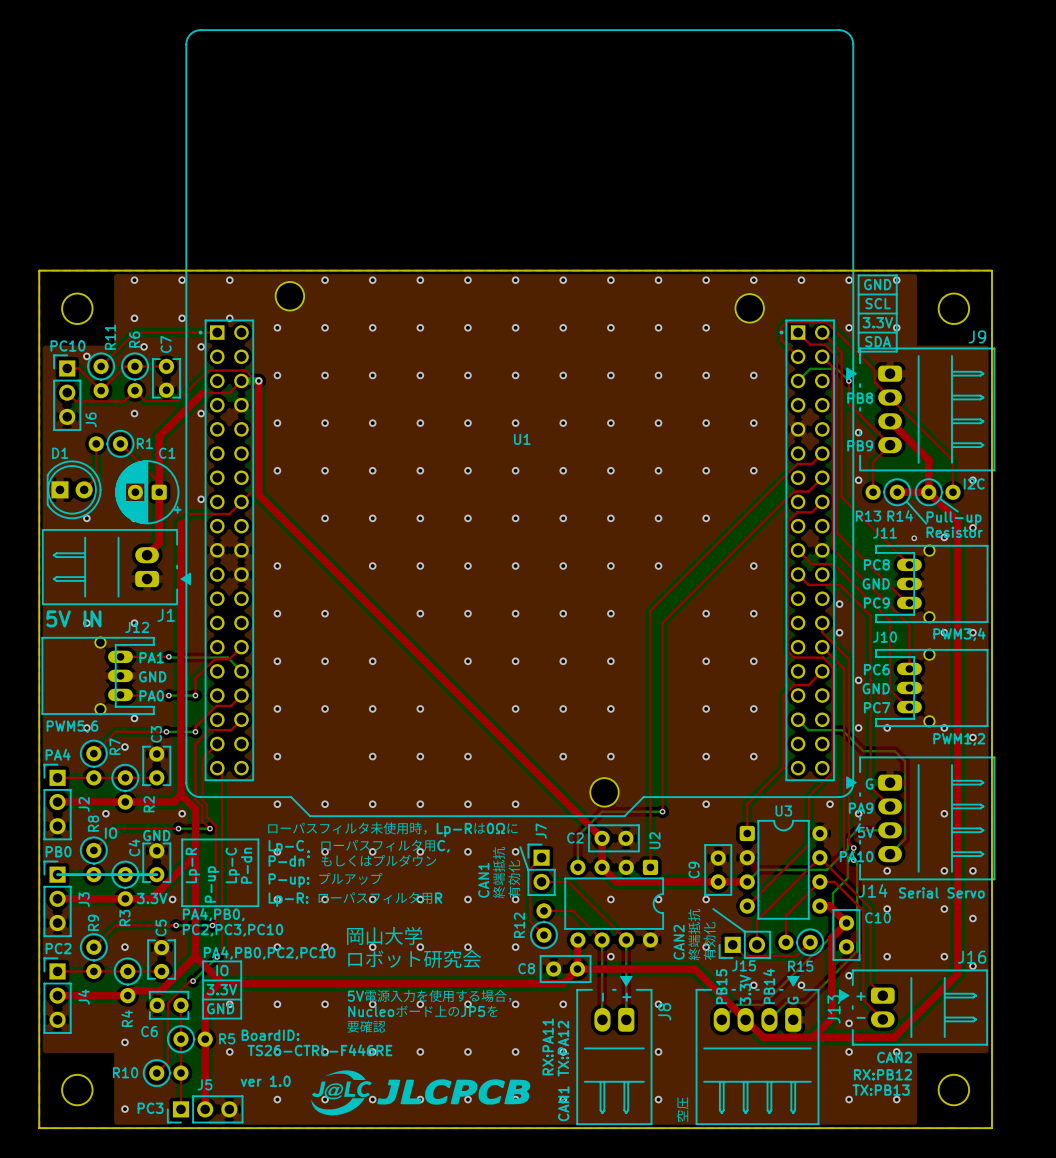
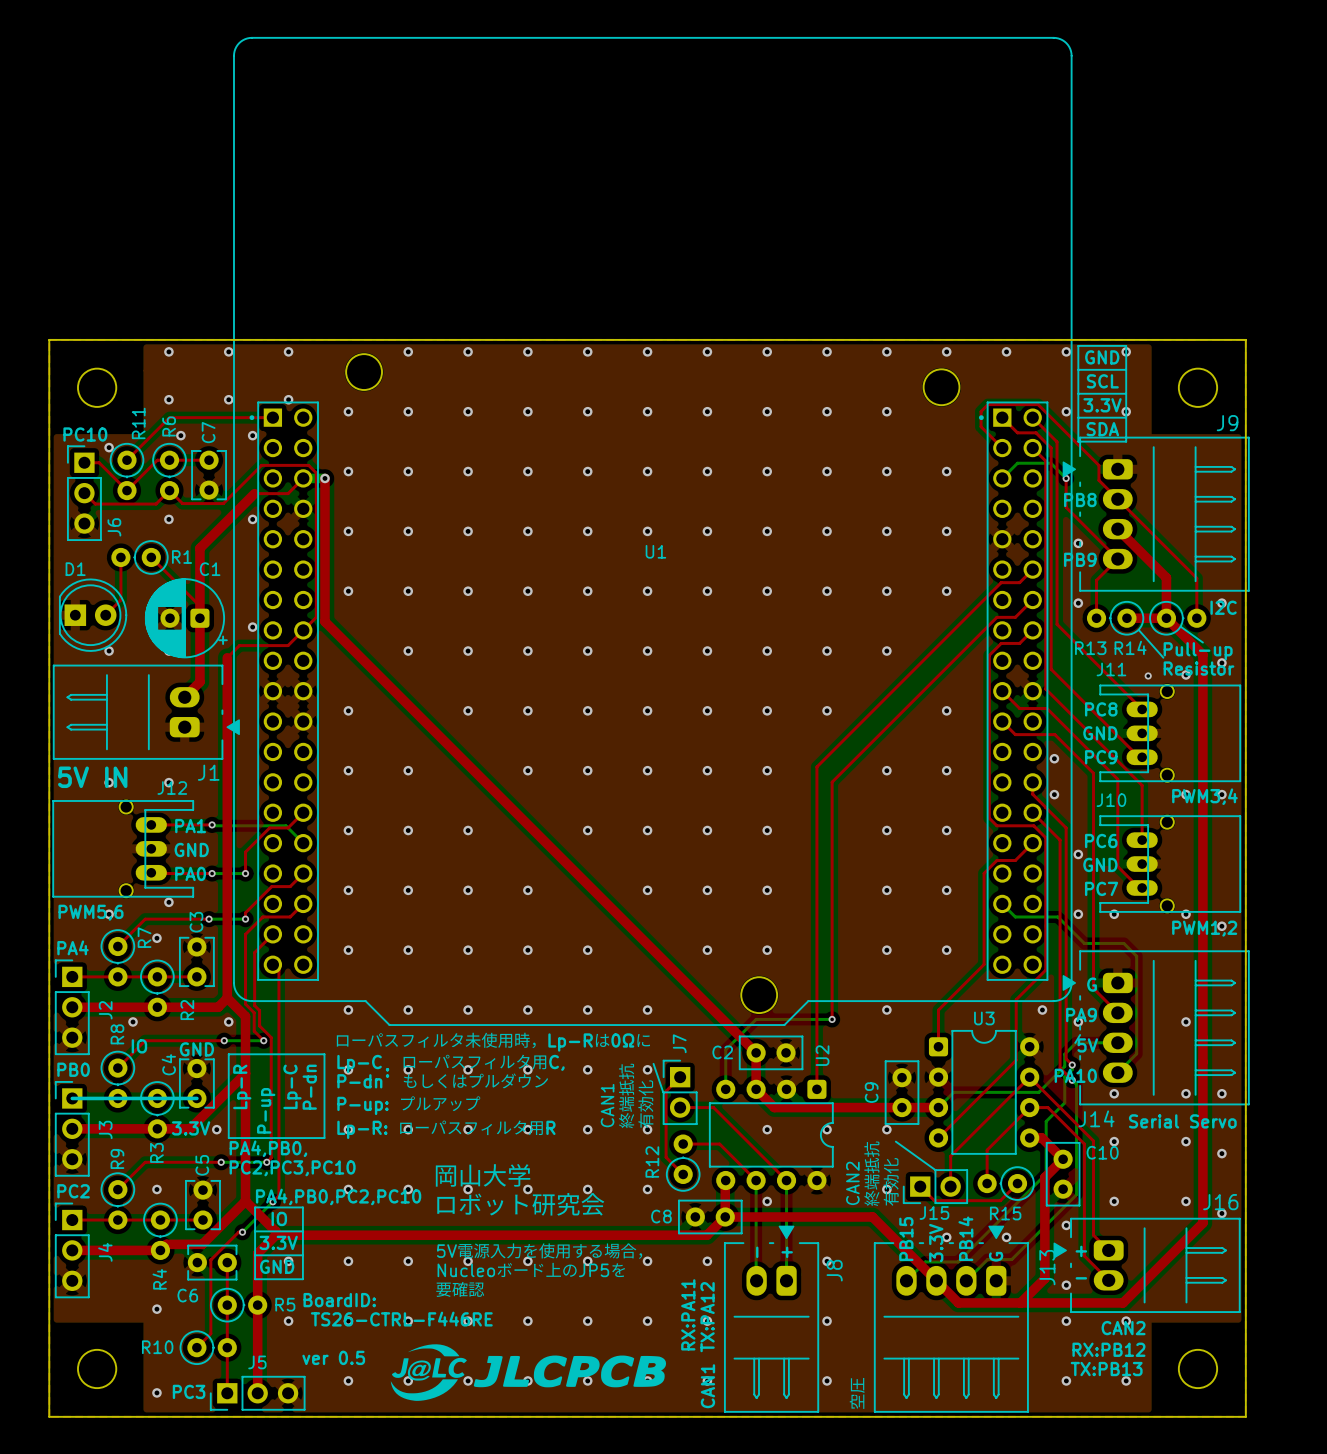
via: none -> (408, 950)
text: ver 1.0 (265, 1081) -> ver 0.5 (333, 1357)

